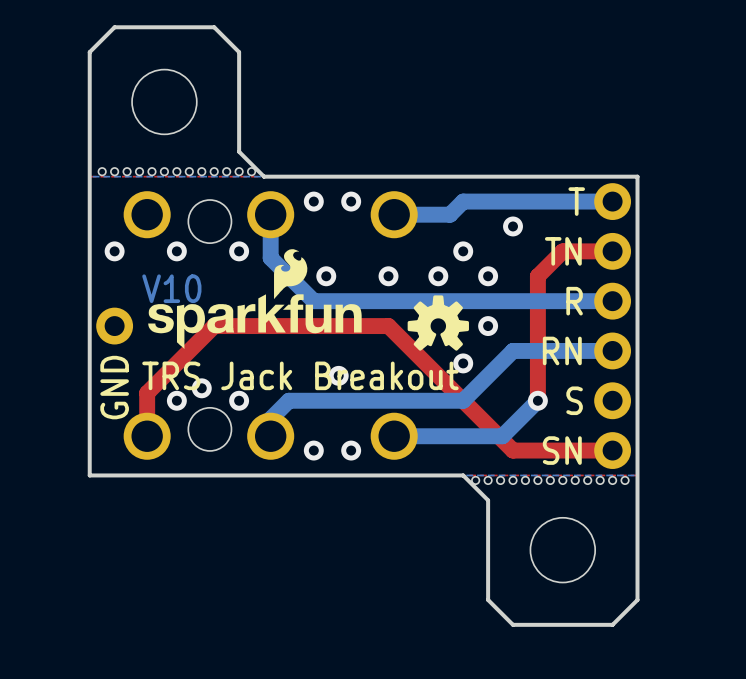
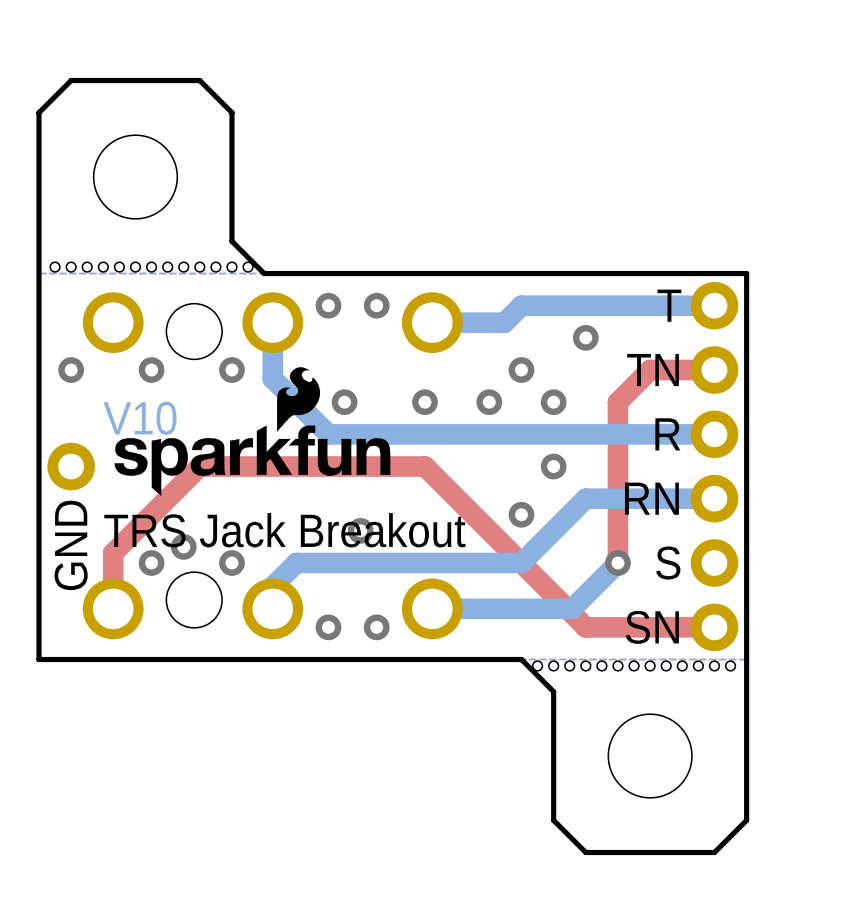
drawing: [407, 295, 469, 351] -> none

